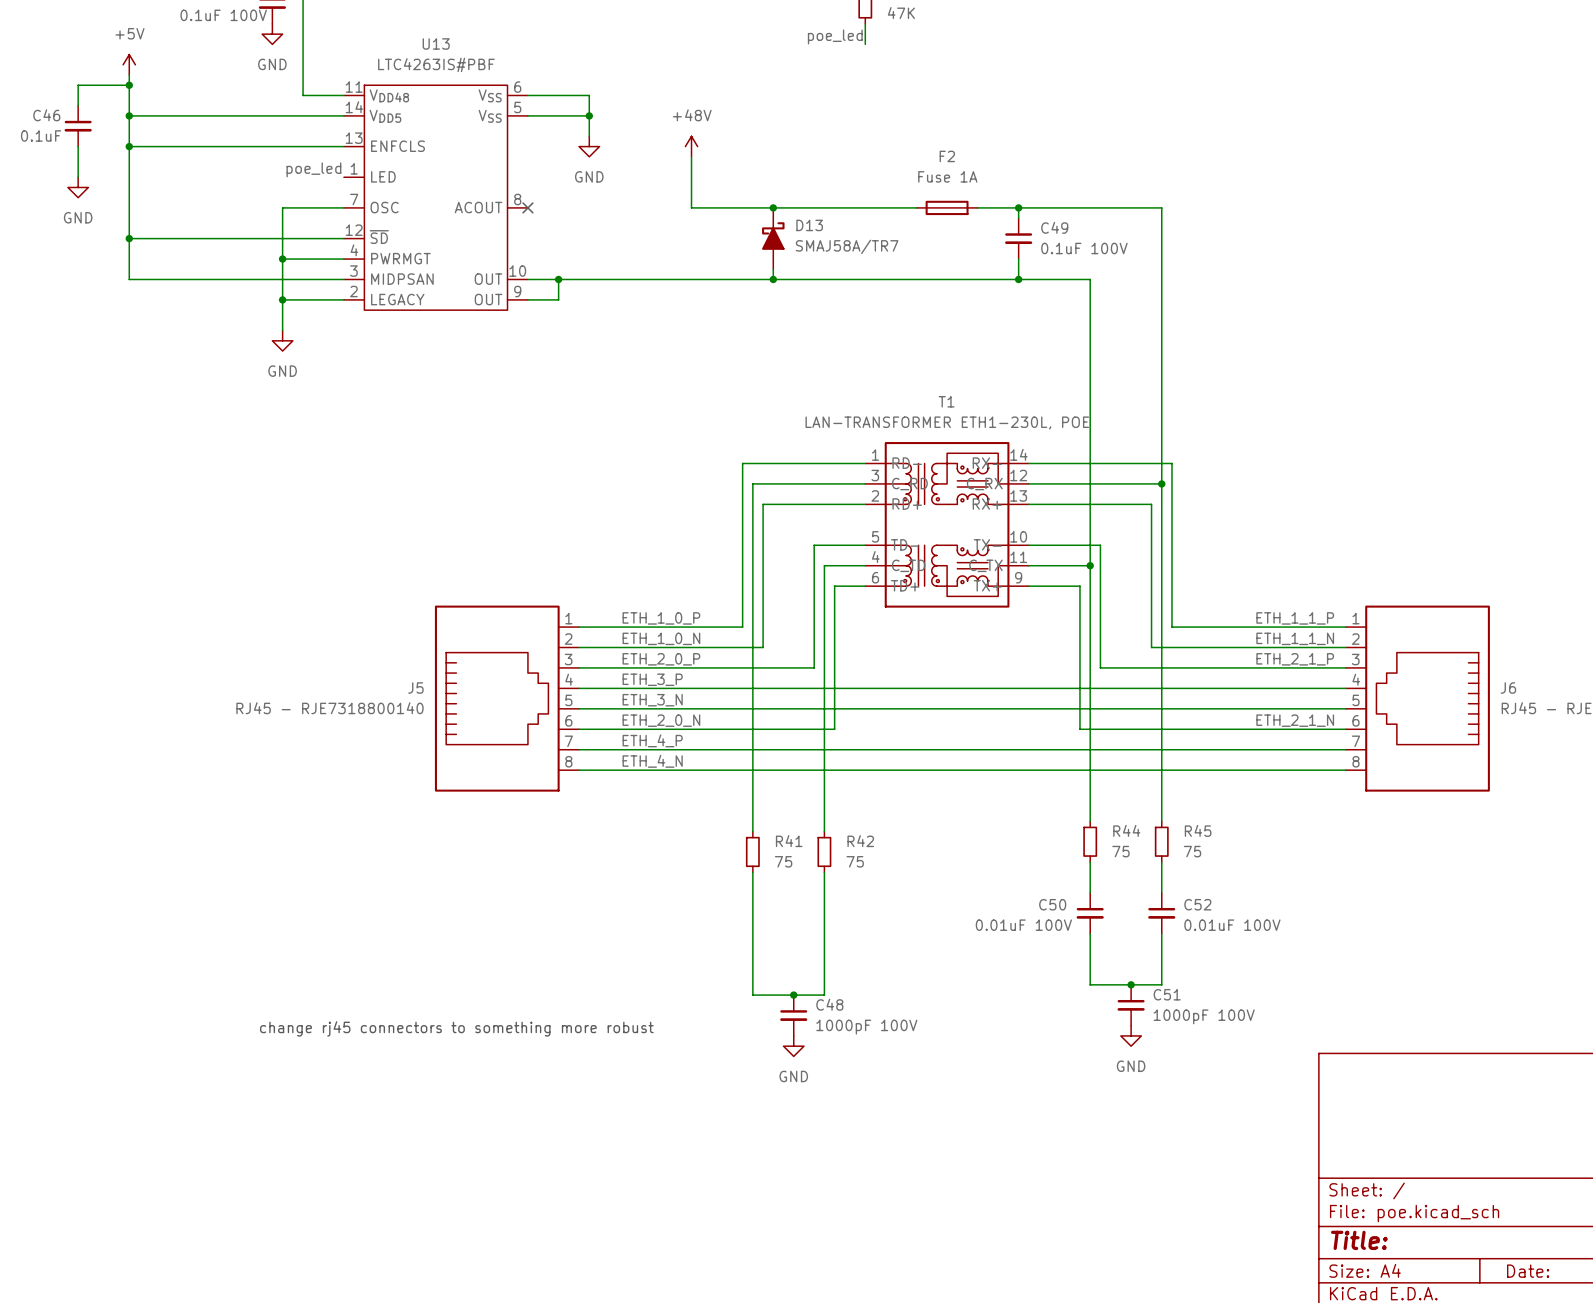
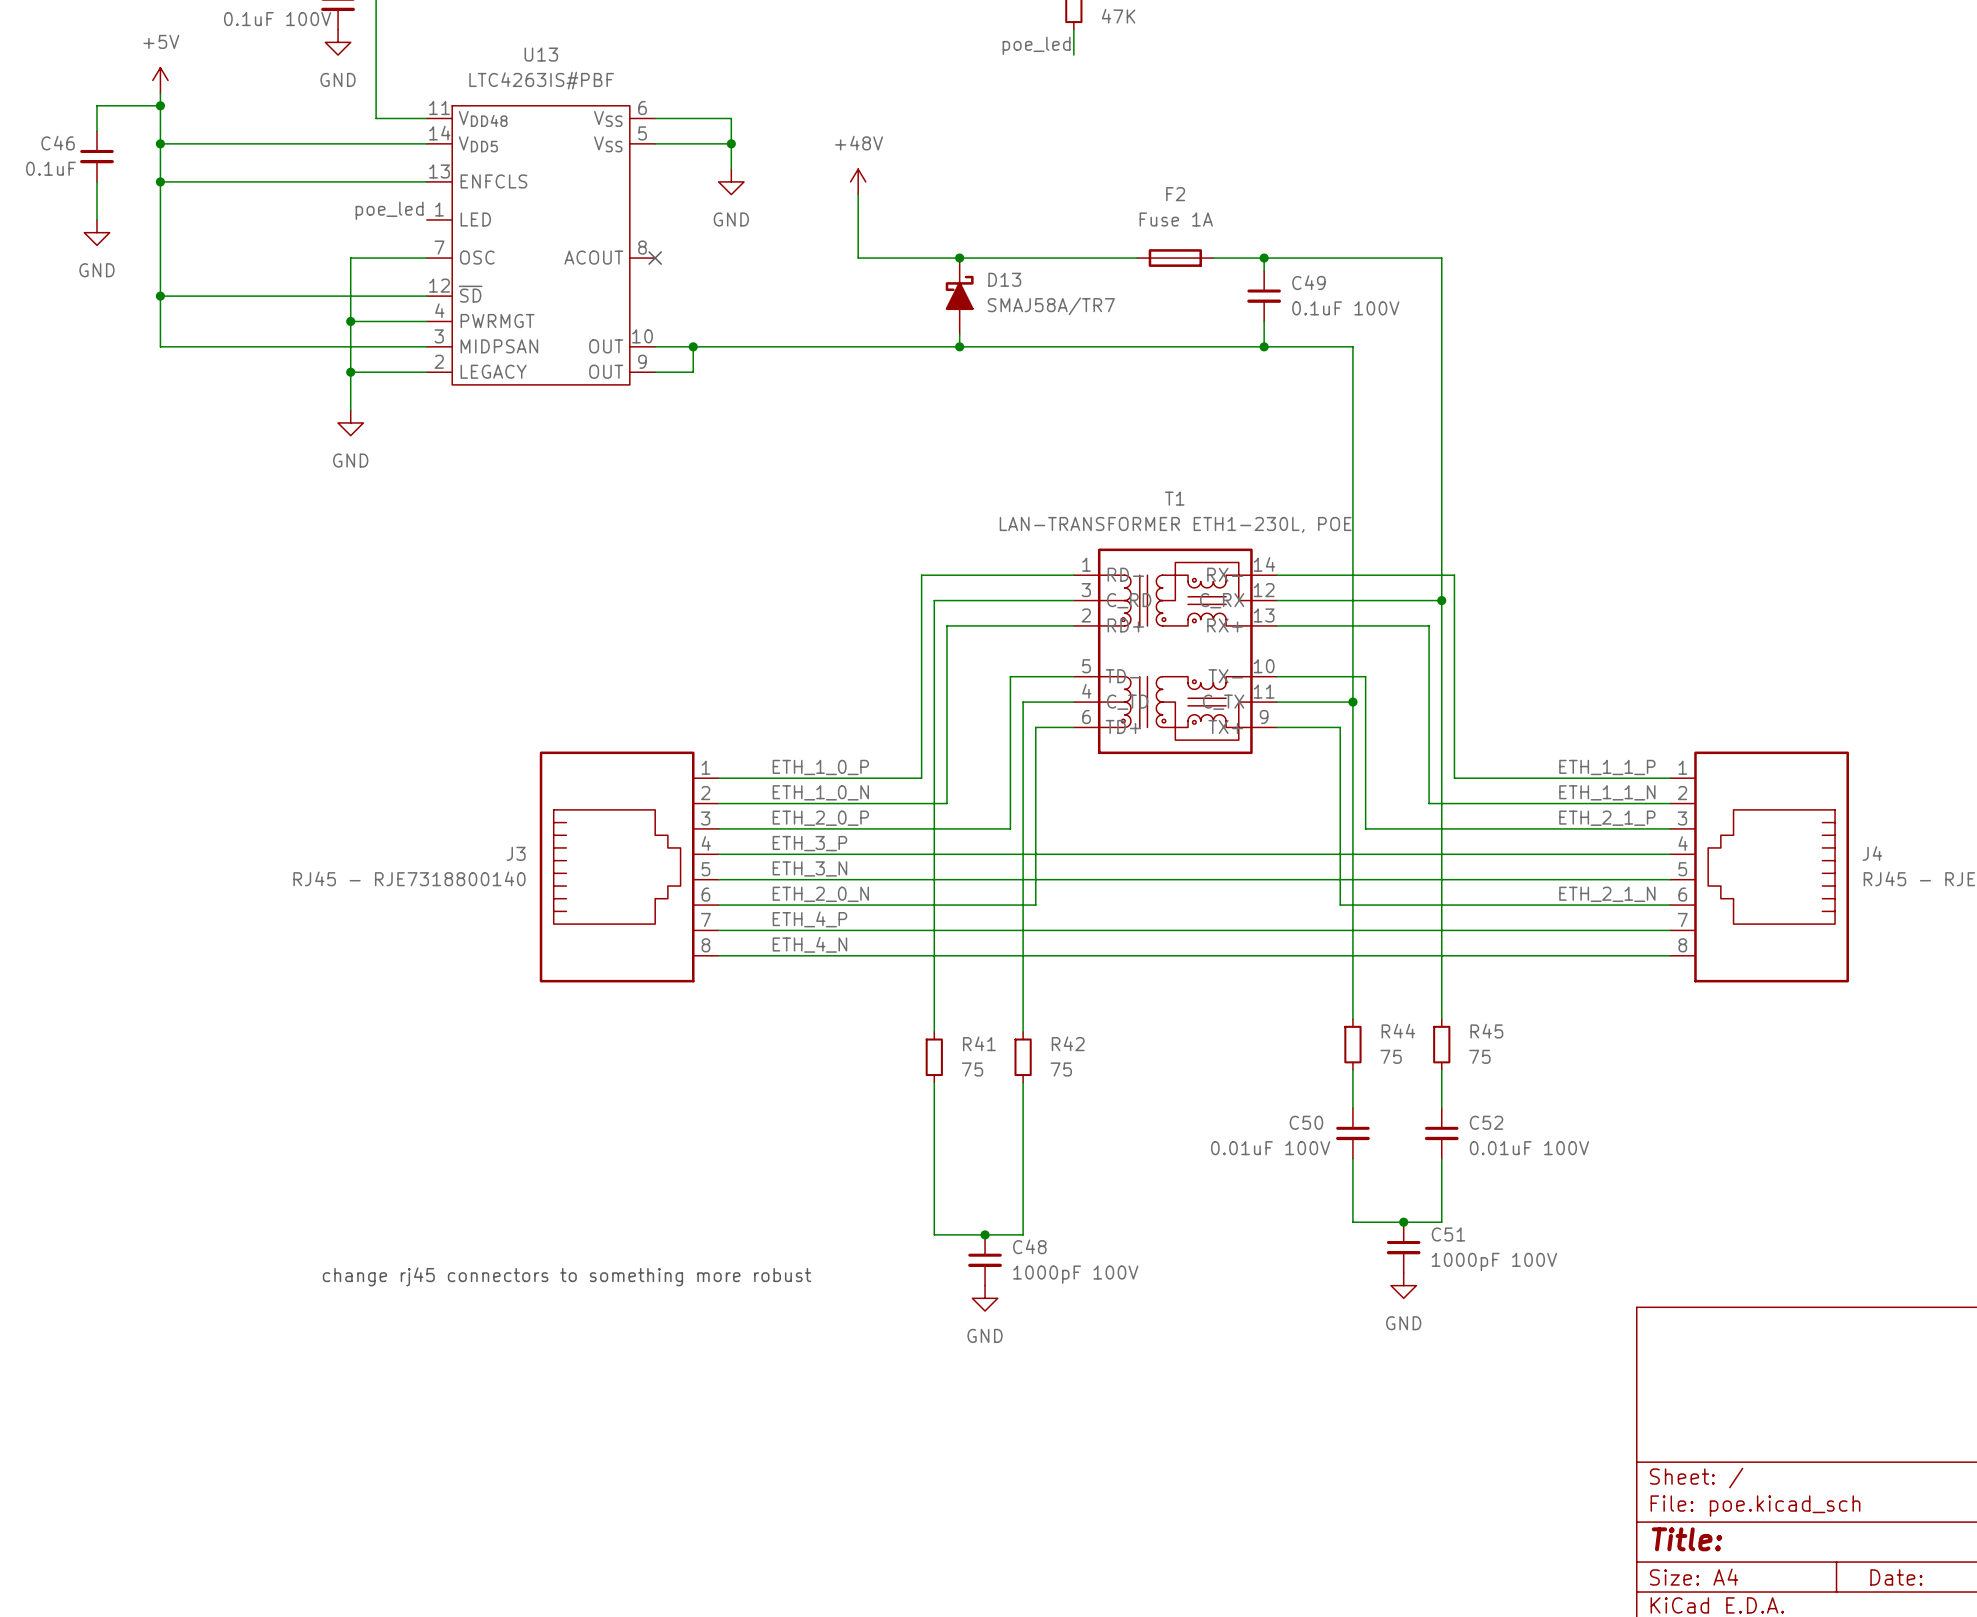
J5 name: J5 (415, 688) -> J3 (516, 853)
J6 name: J6 (1508, 688) -> J4 (1872, 853)

